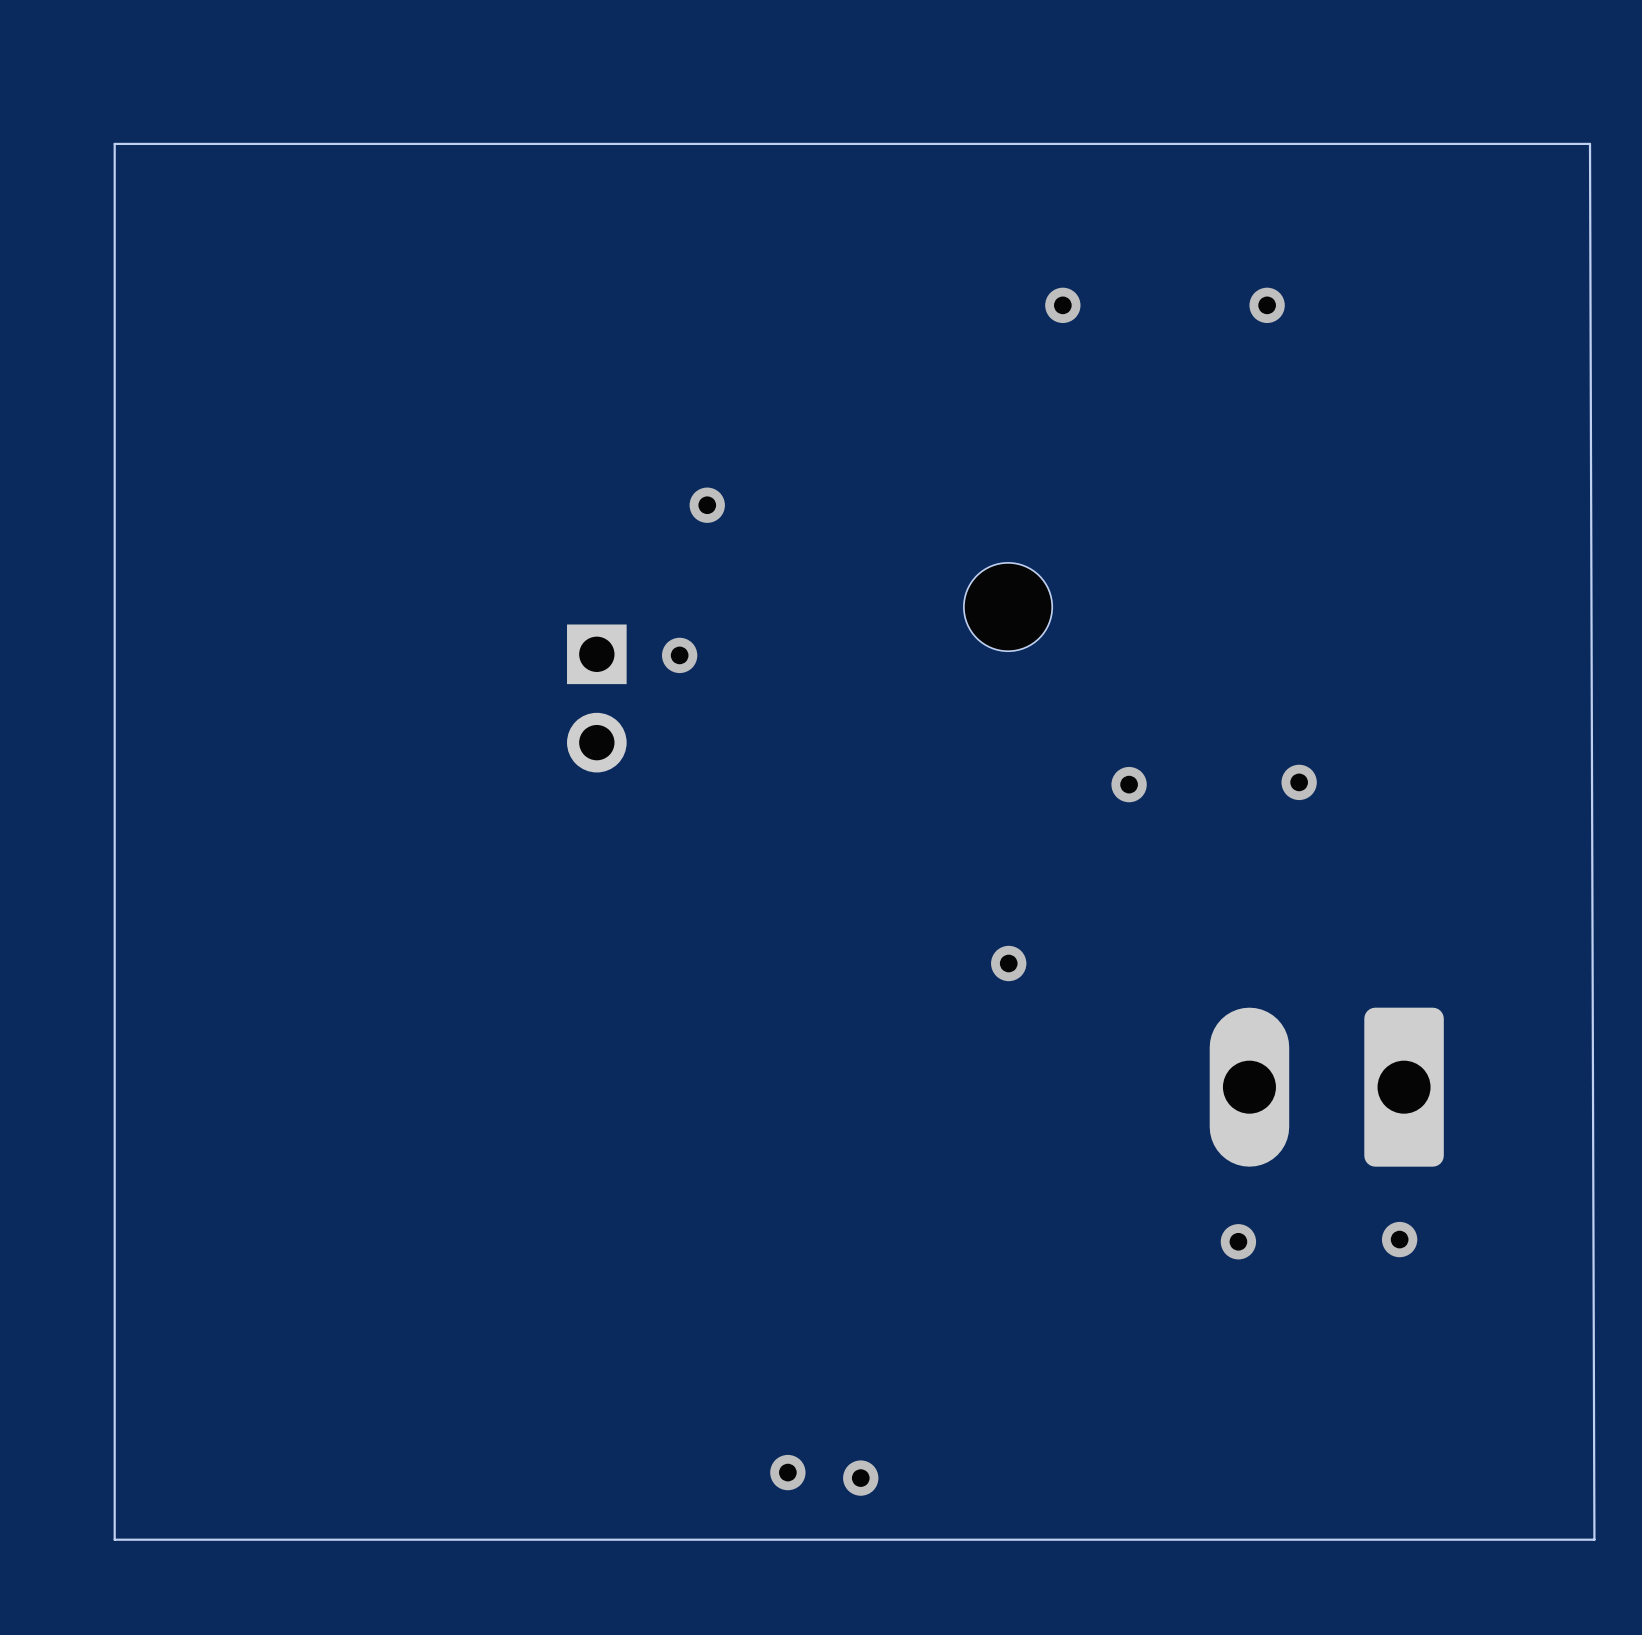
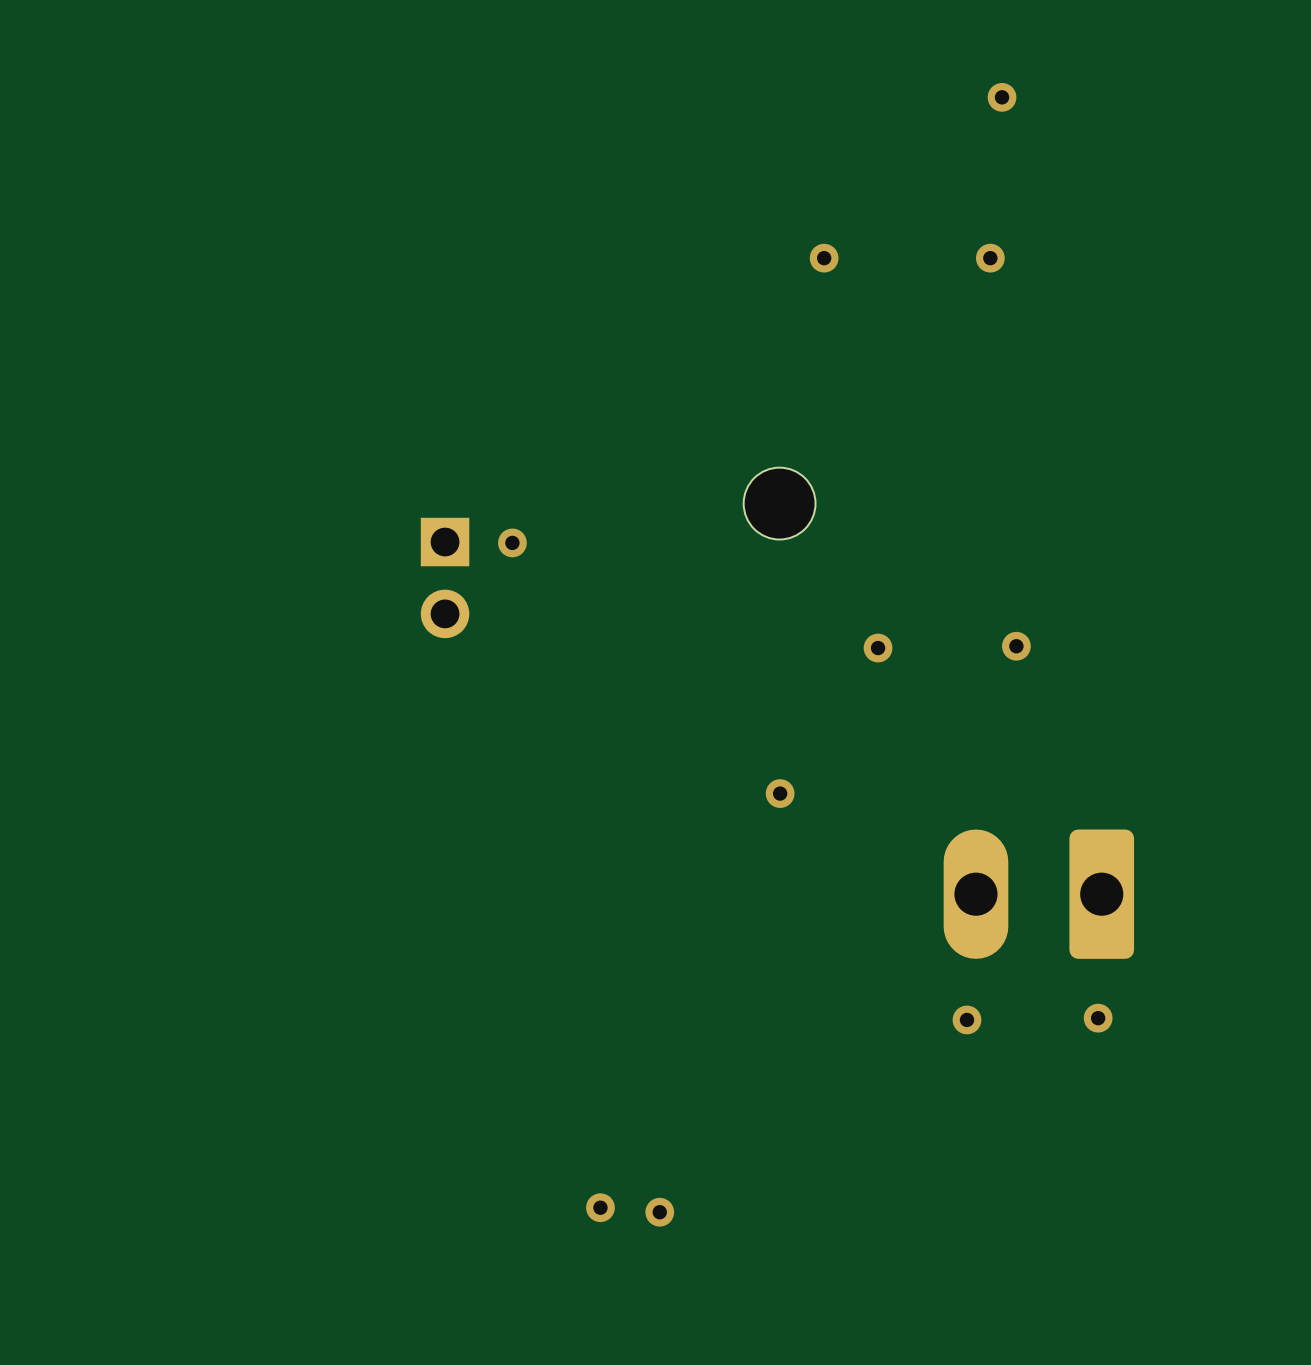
via: none -> (1002, 97)
board edge: (1590, 143) (1594, 1539) (114, 1539) (114, 143) (1590, 143) -> none
via: (707, 505) -> none

